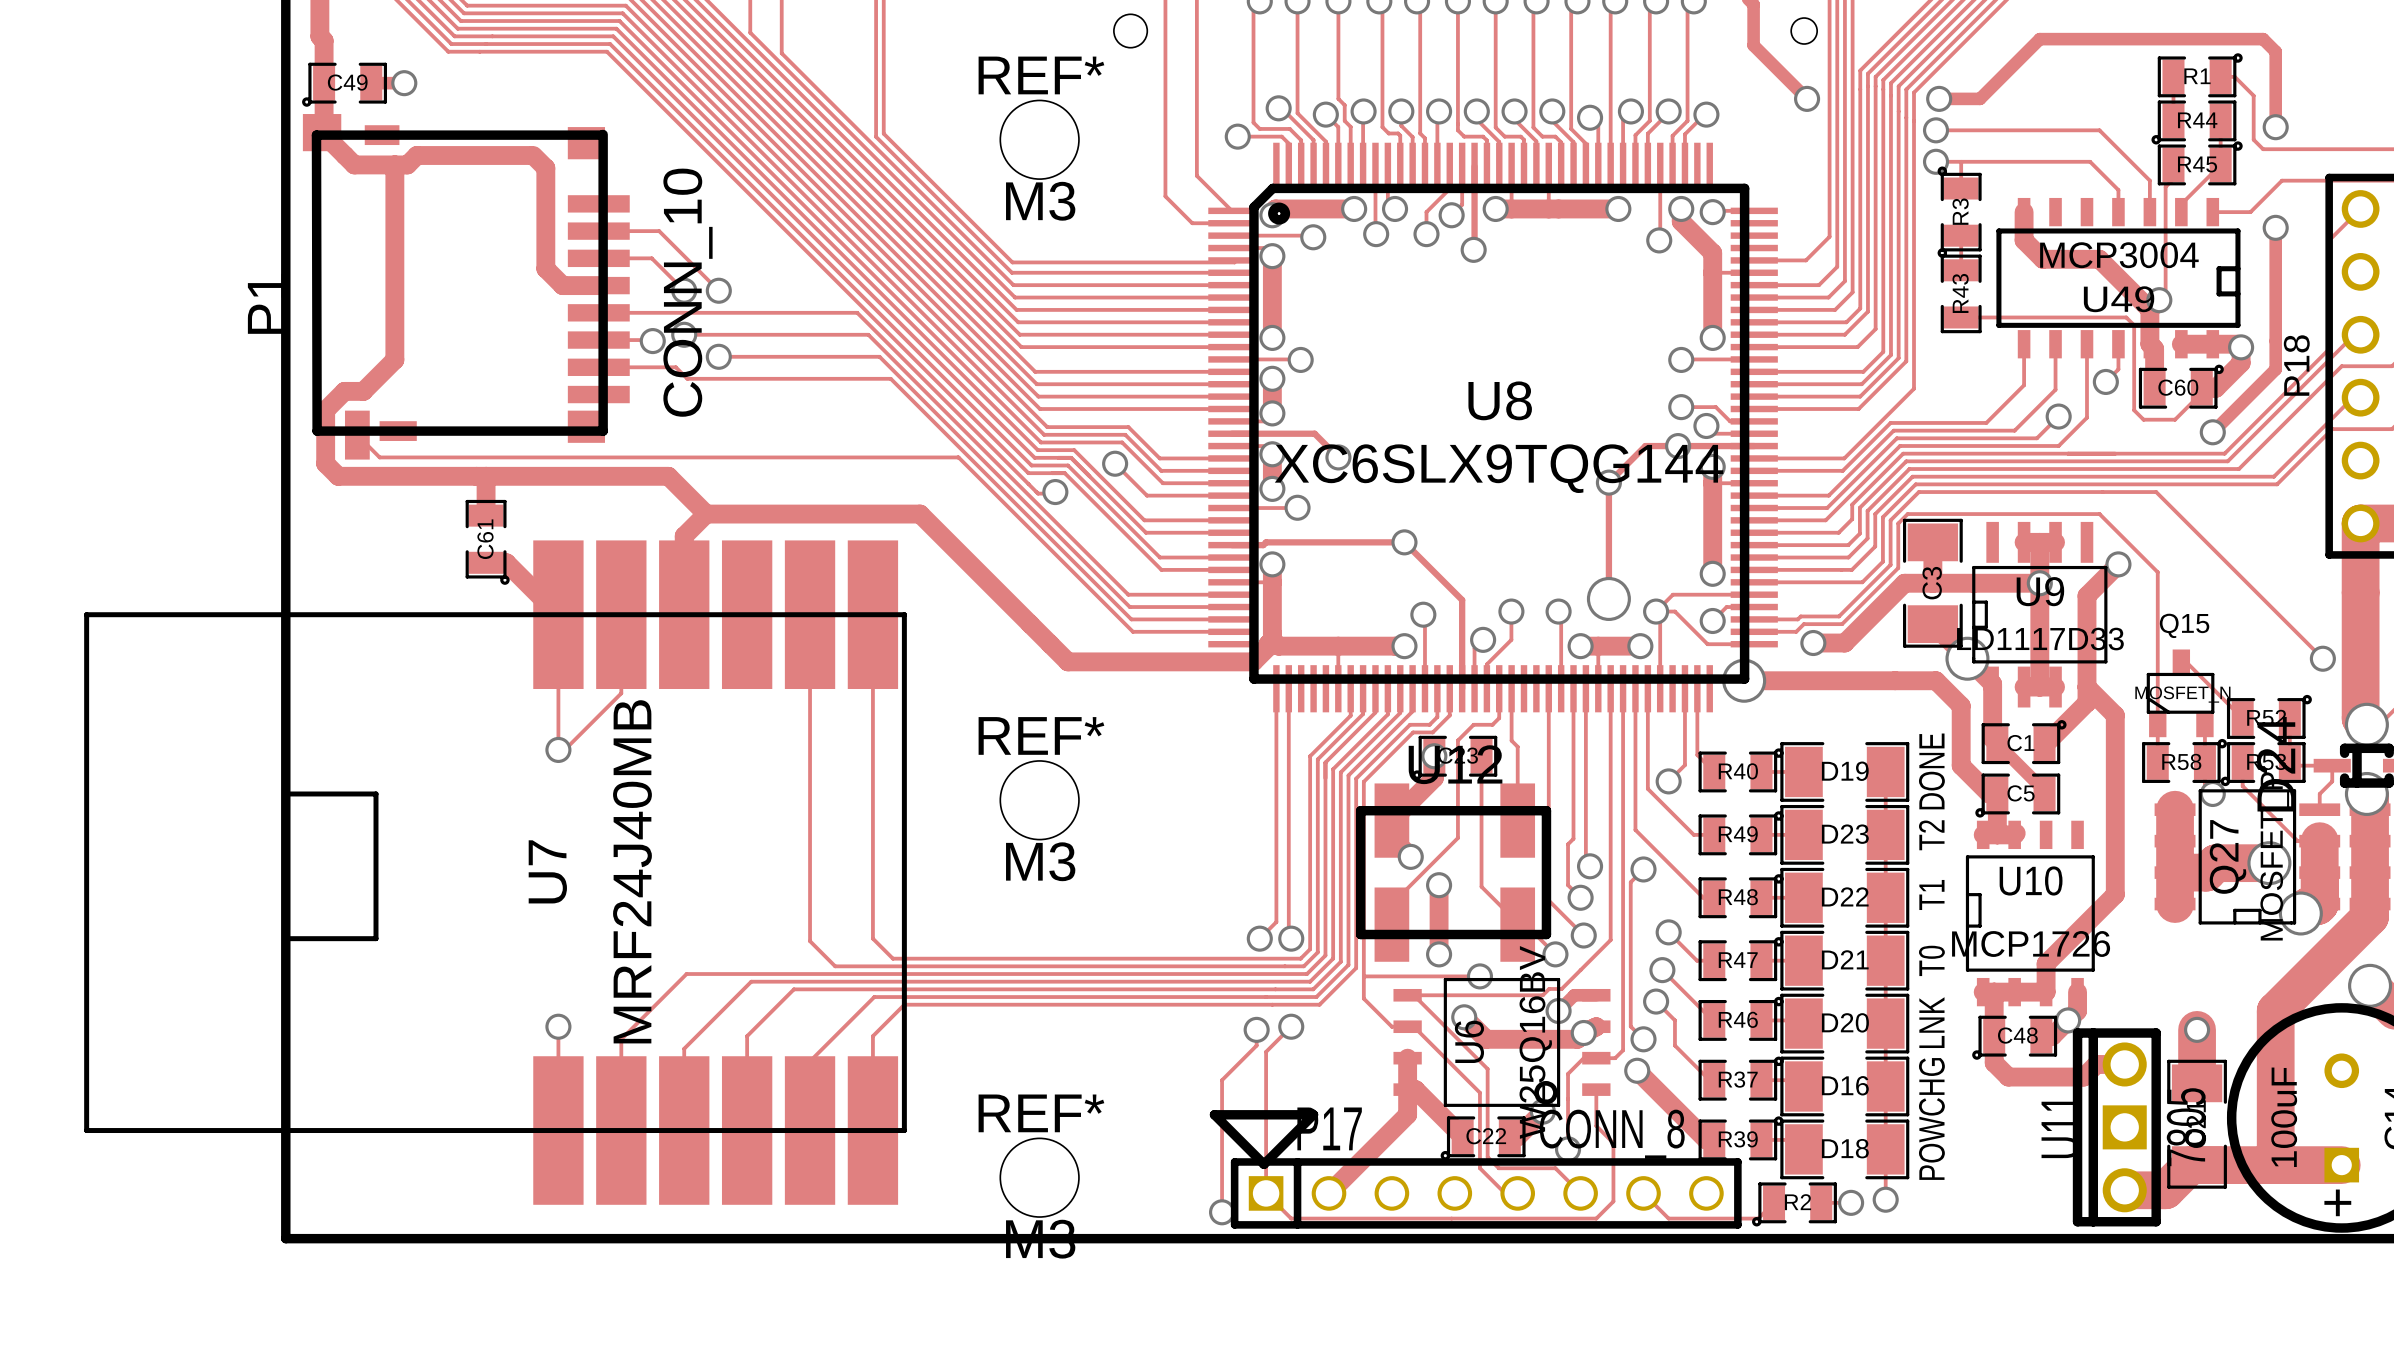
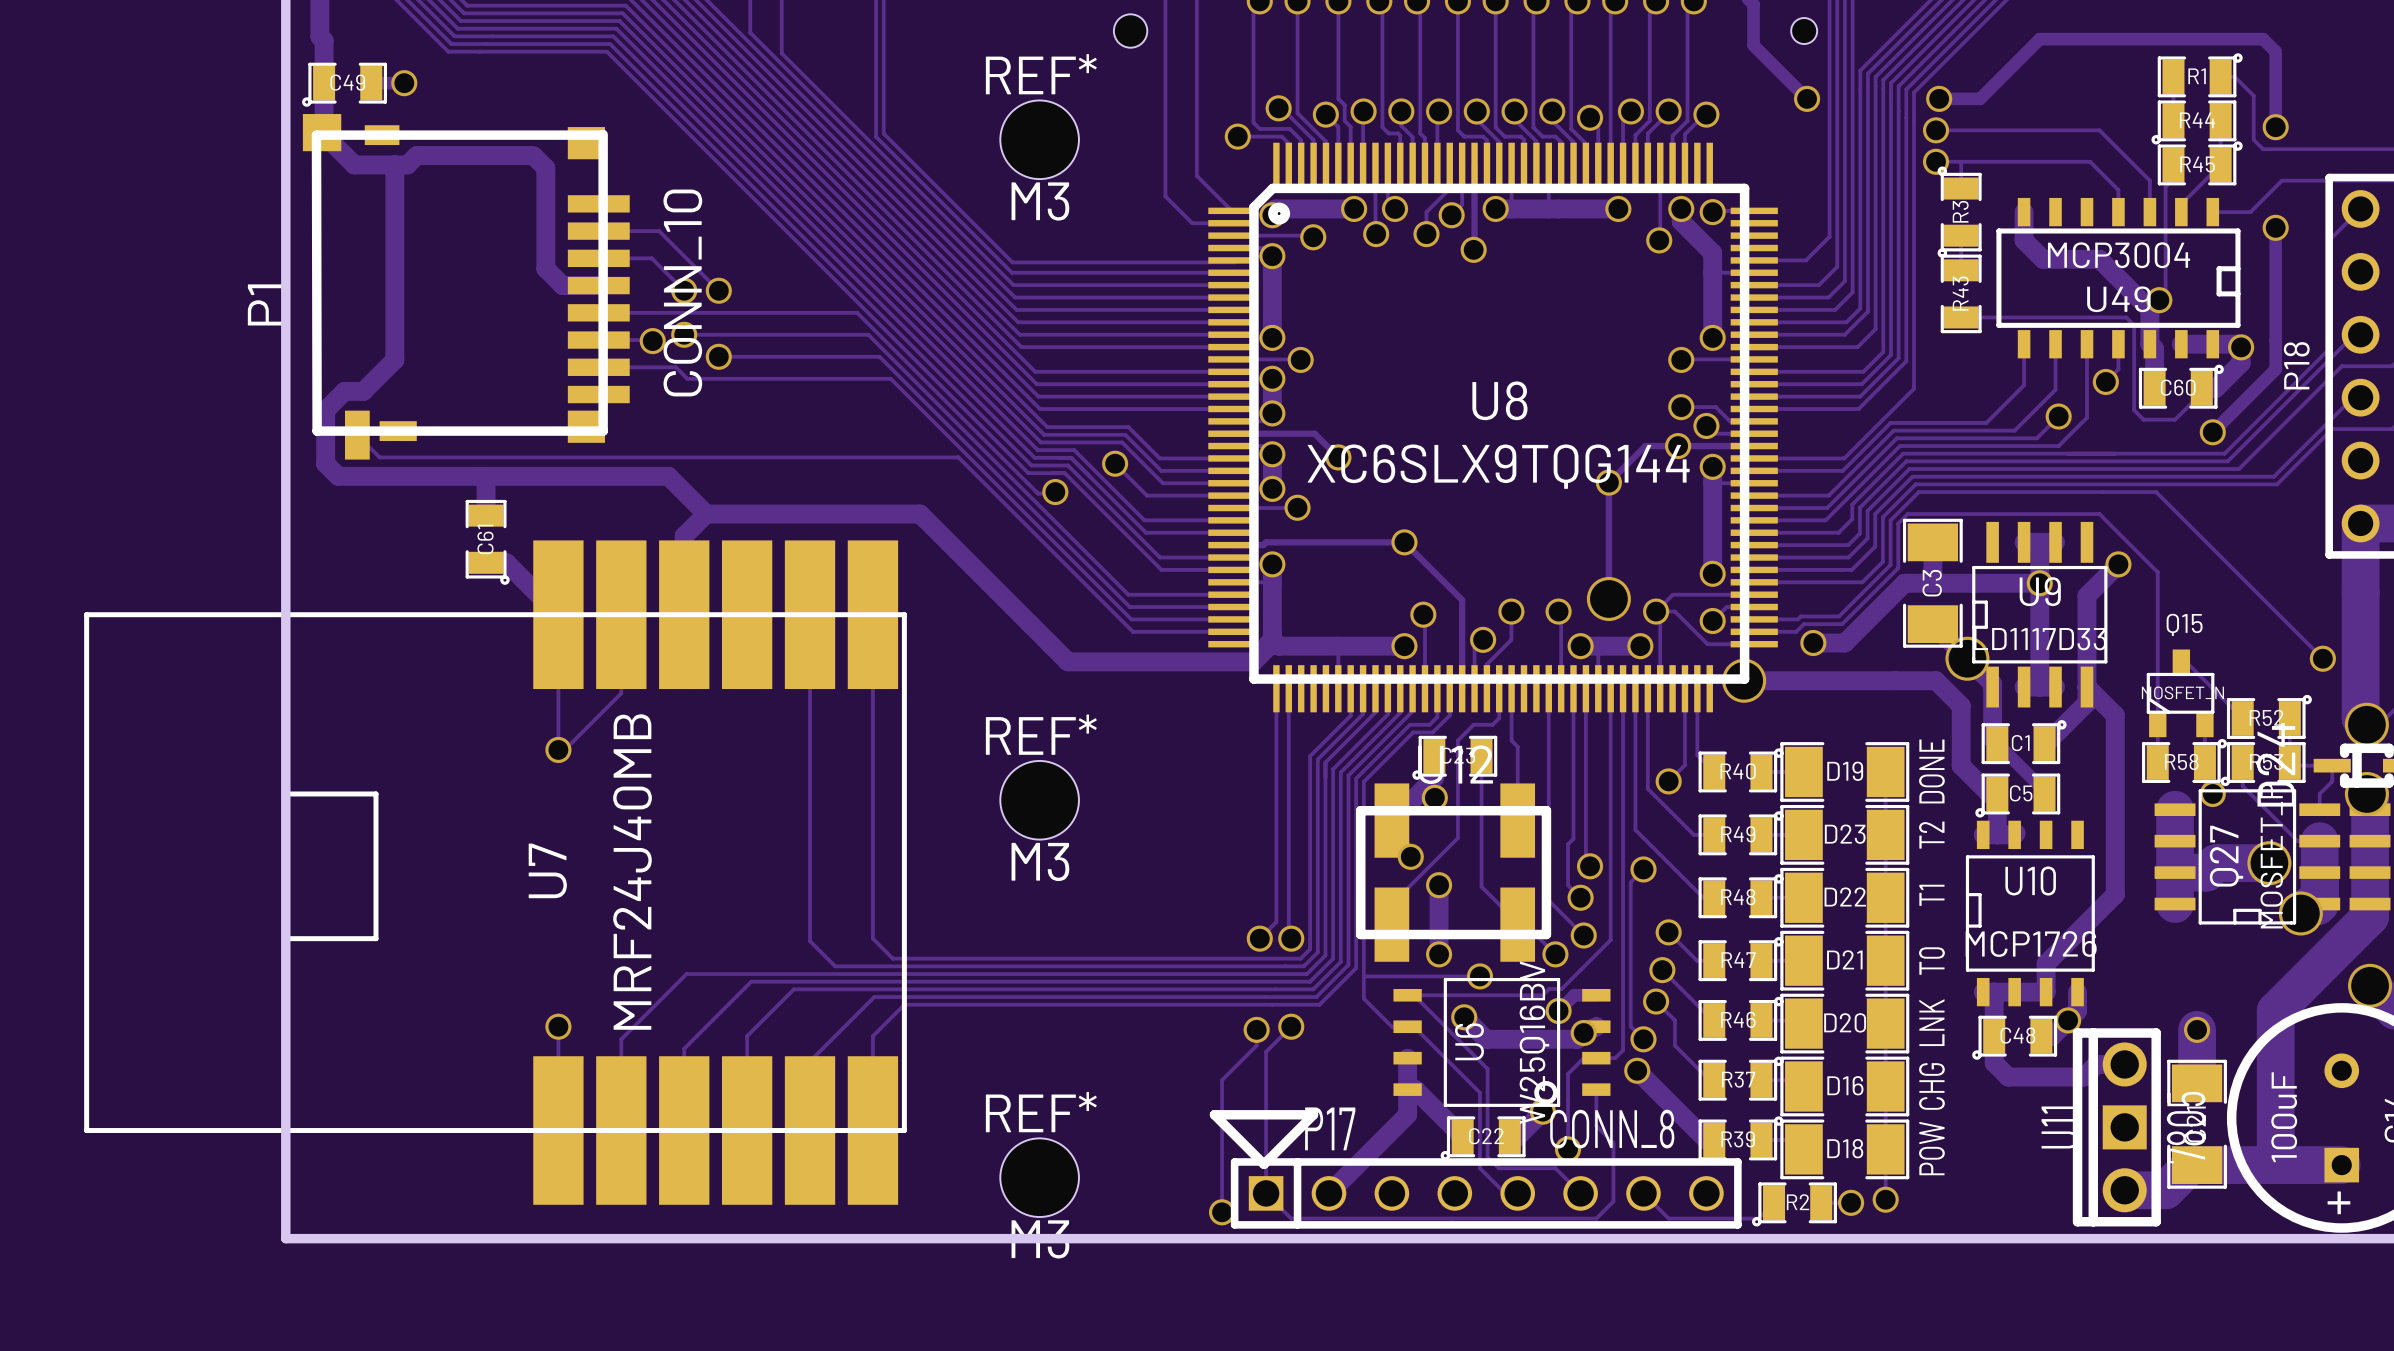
via position: (1434, 756) -> (1434, 797)

